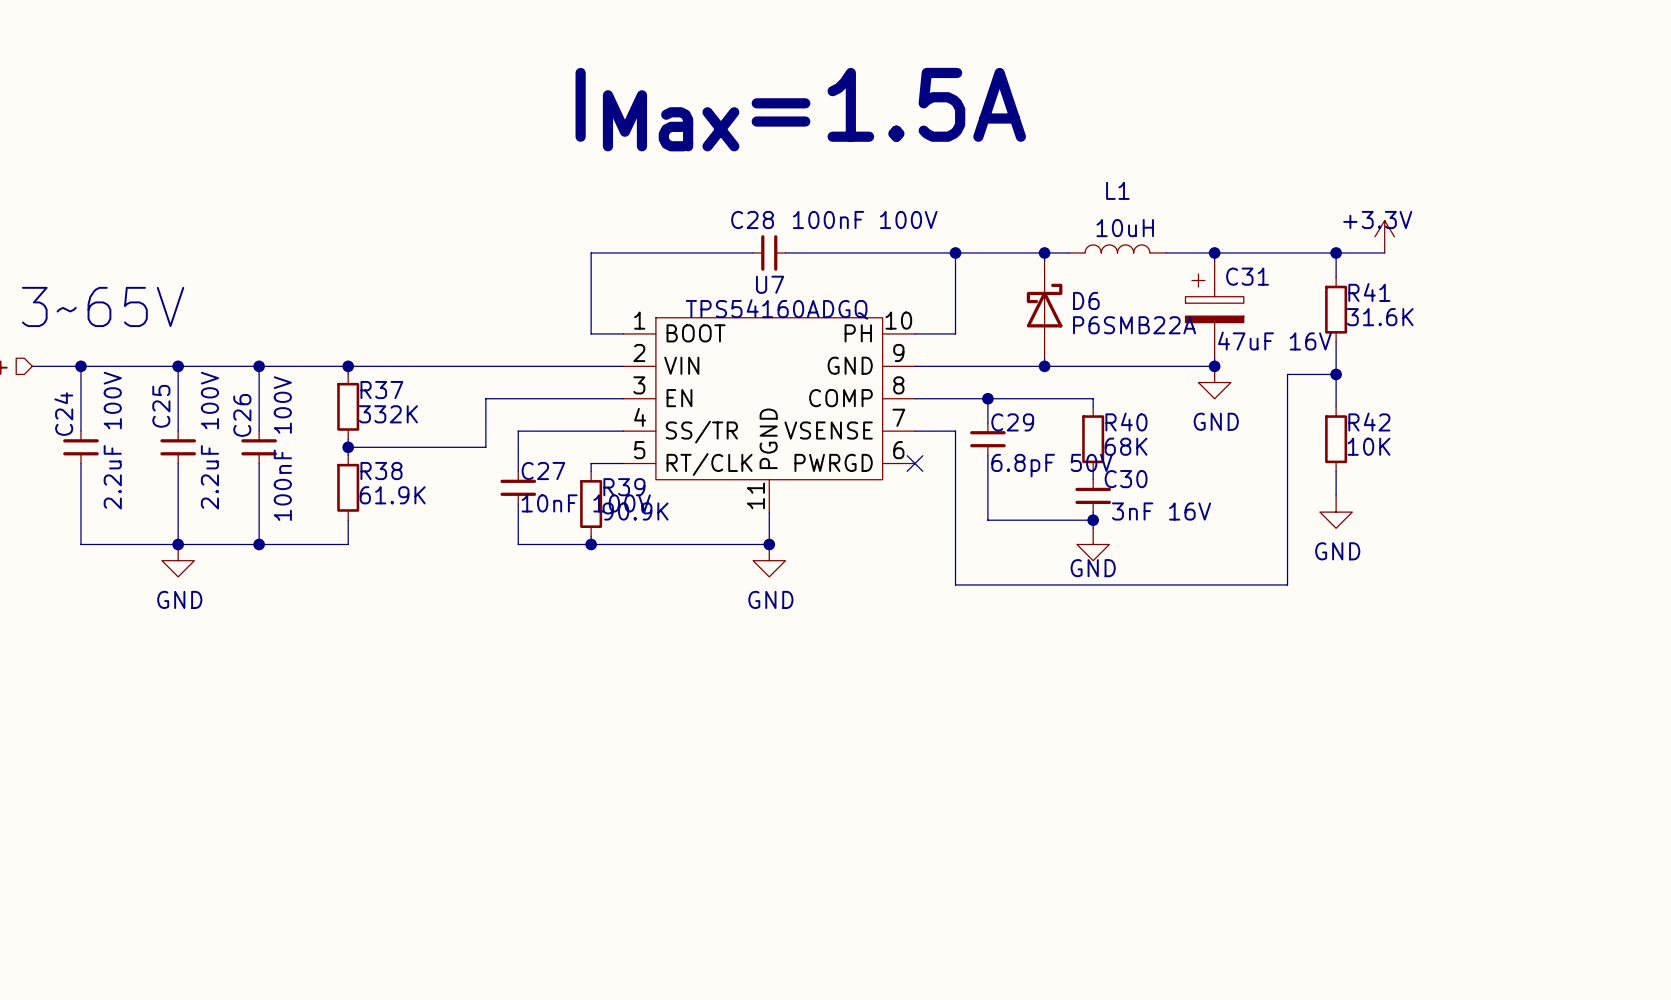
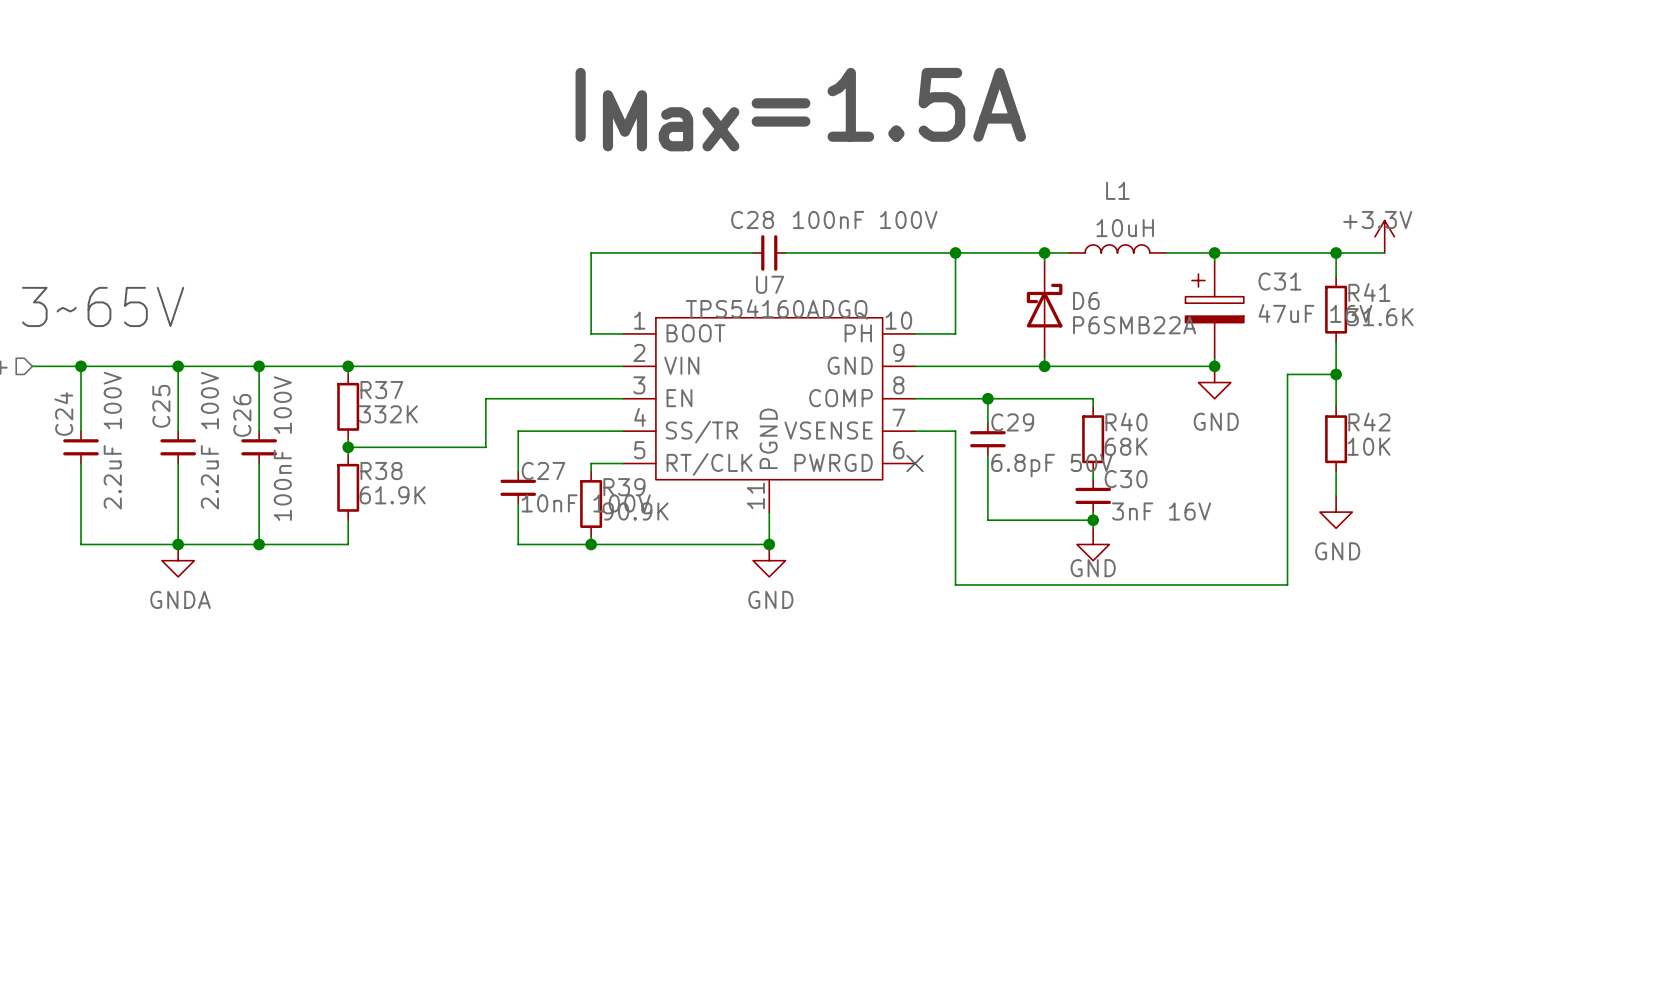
C31 name position: C31 (1247, 276) -> C31 (1279, 281)
C31 value position: 47uF 16V (1274, 341) -> 47uF 16V (1315, 313)
power symbol: GND (178, 560) -> GNDA (178, 560)

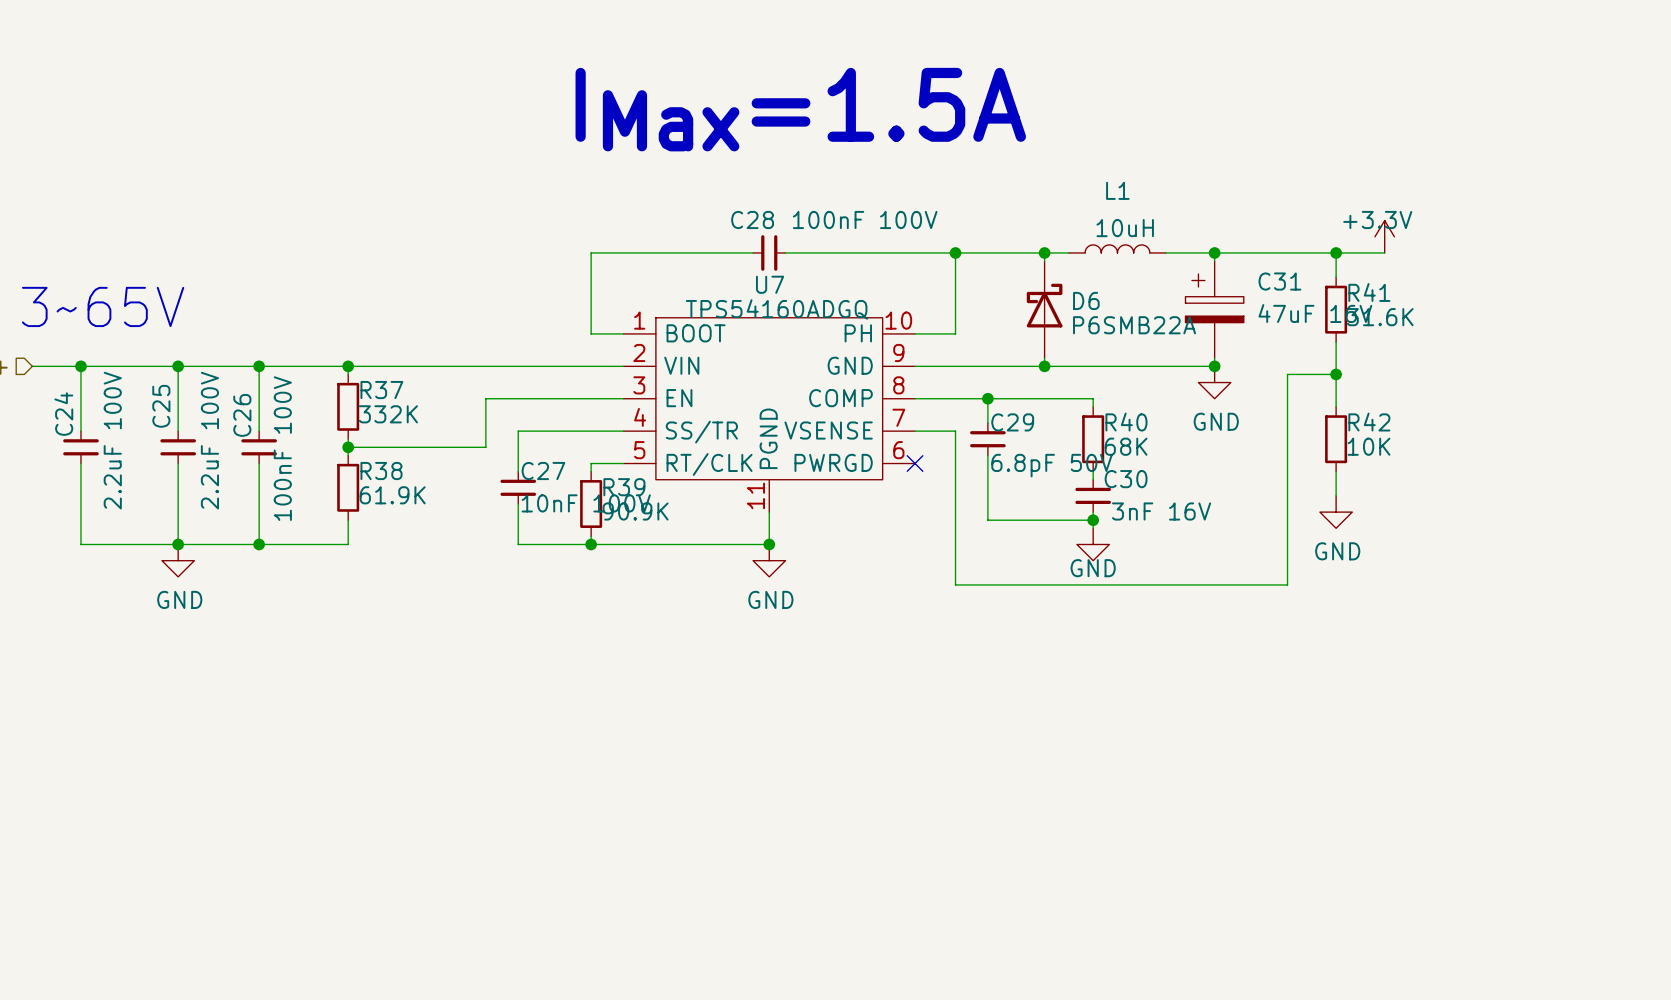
power symbol: GNDA (178, 560) -> GND (178, 560)

